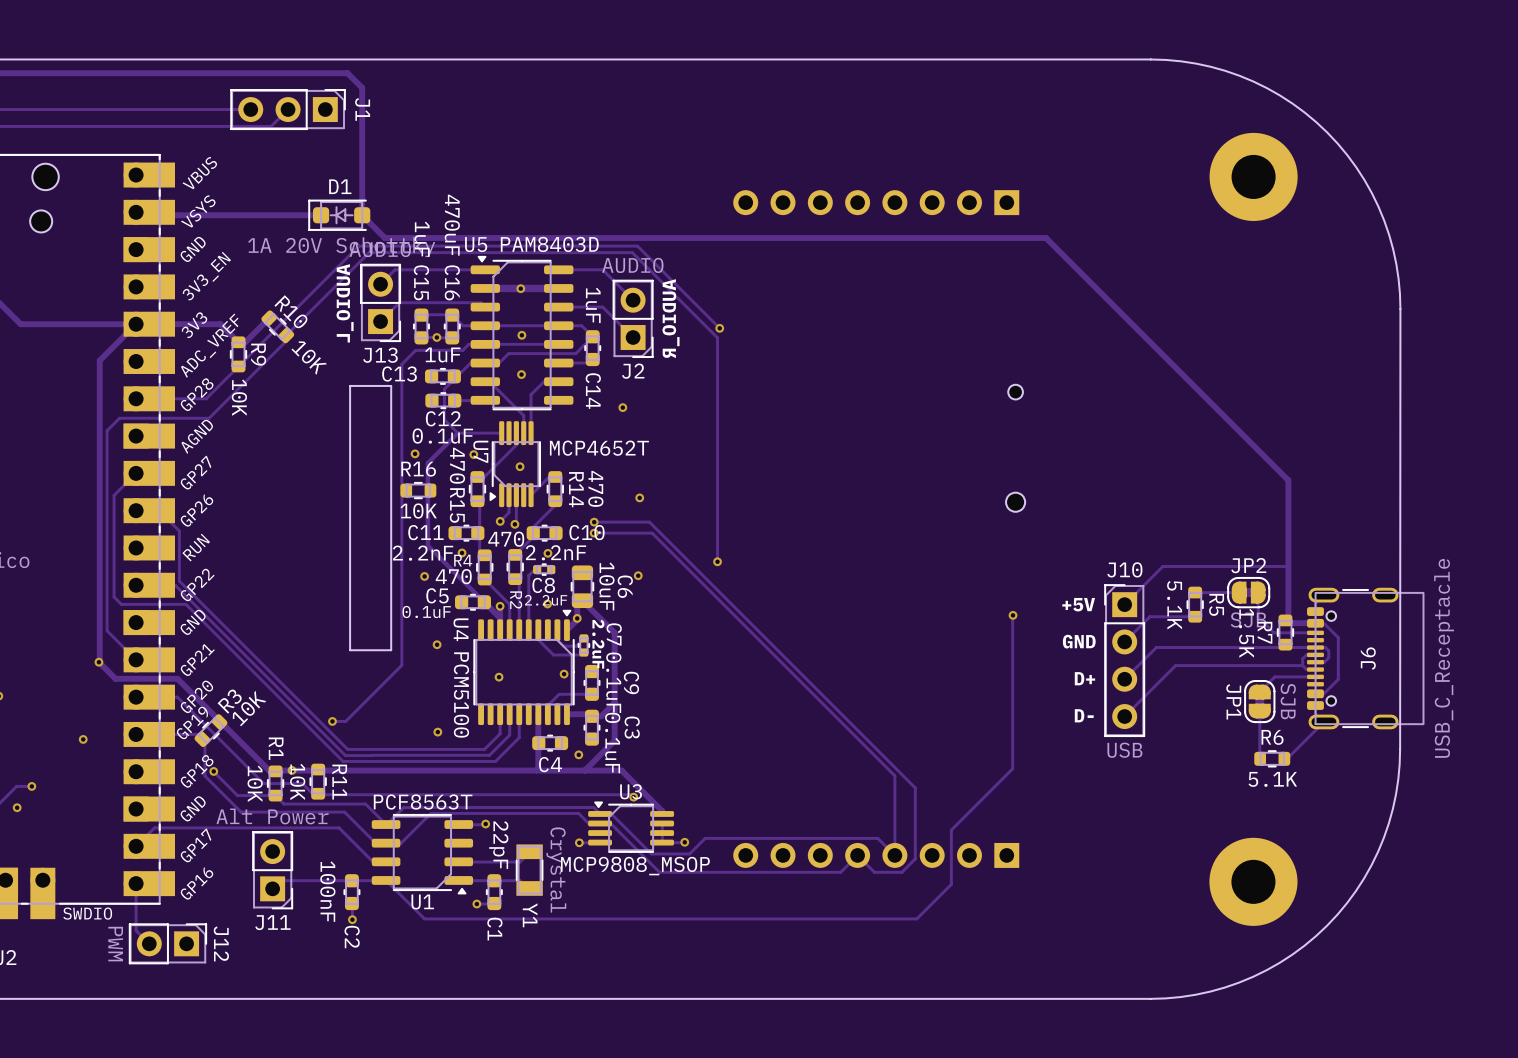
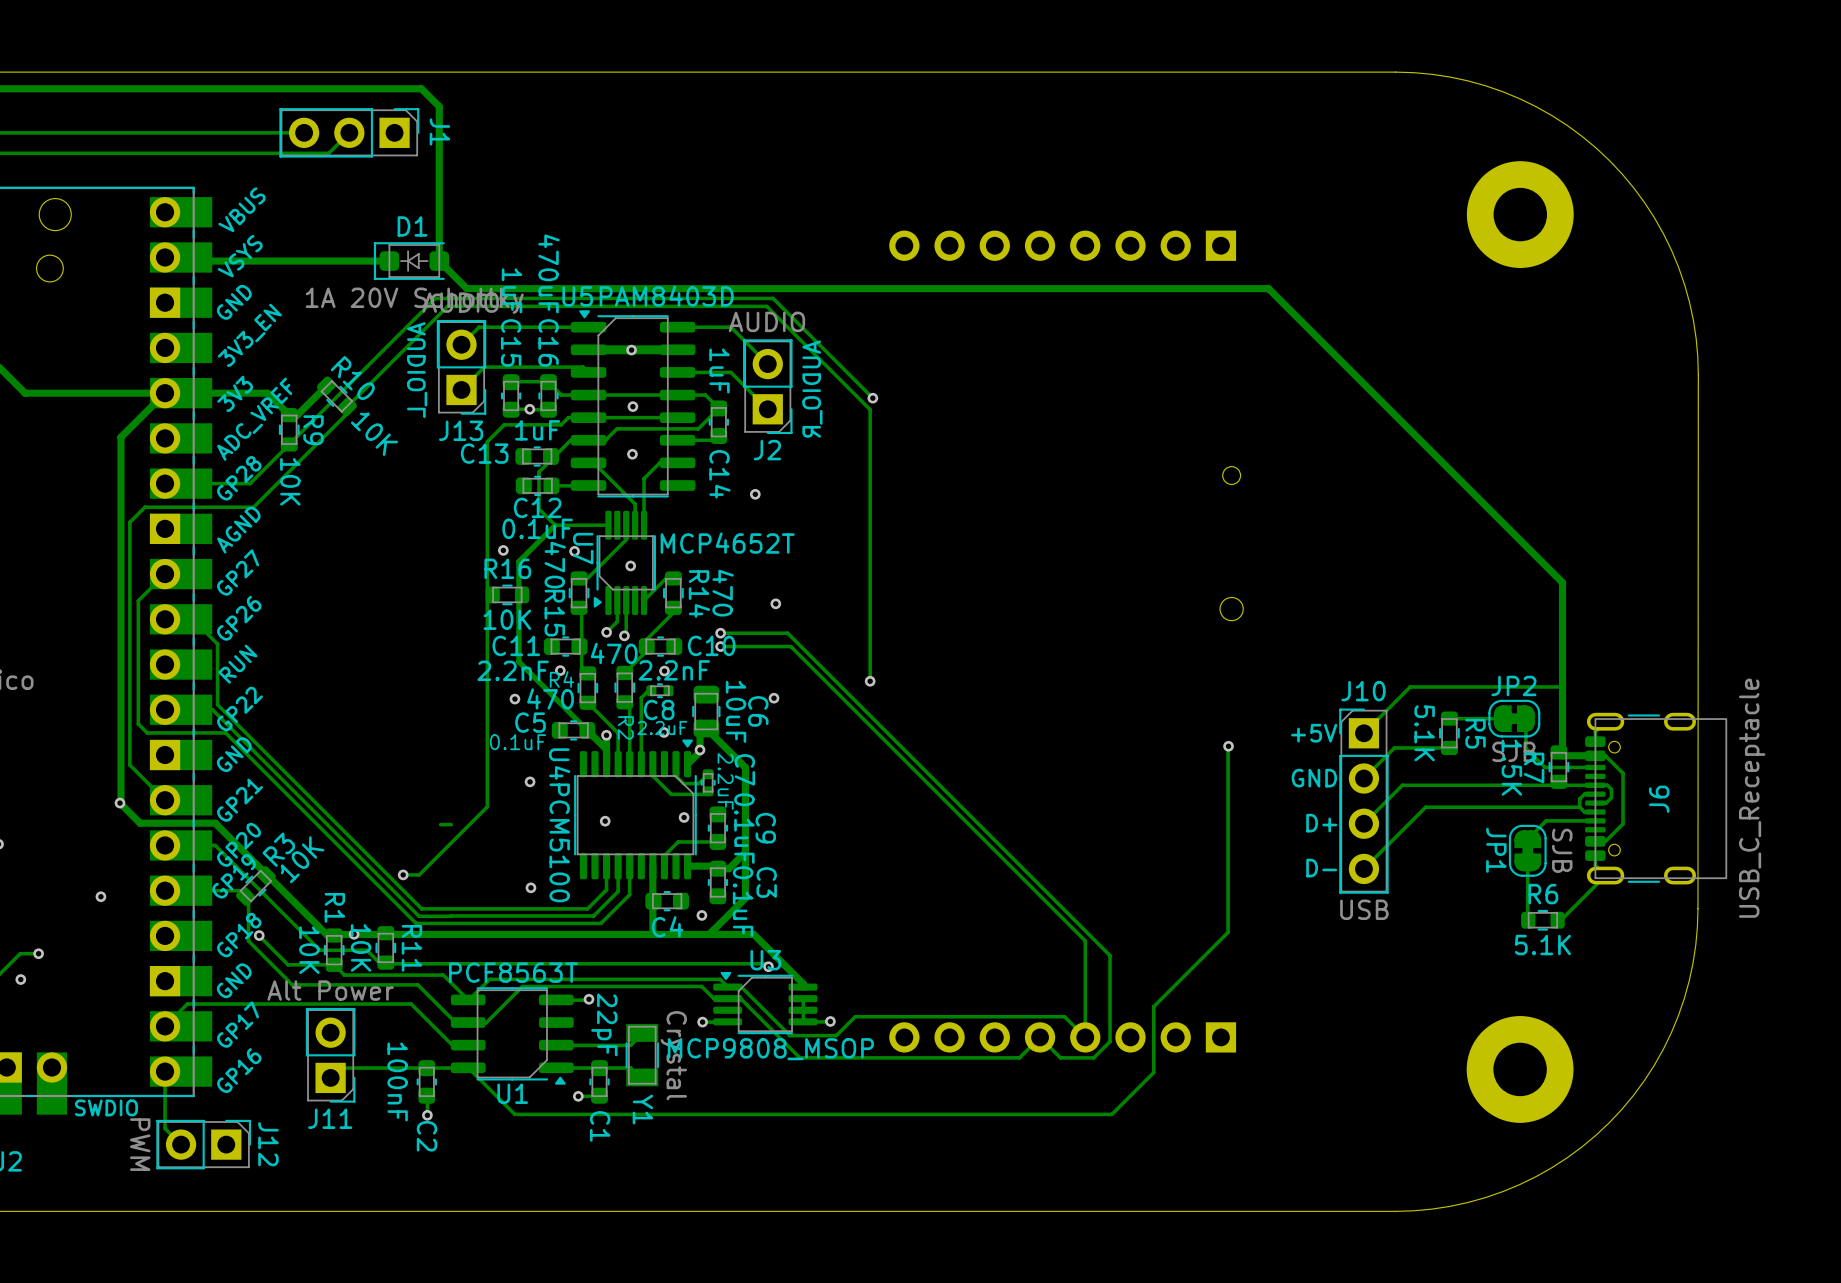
board edge: (391, 385) (350, 385) (350, 650) (391, 650) (391, 385) -> none
track: none -> (451, 824) (440, 824)

